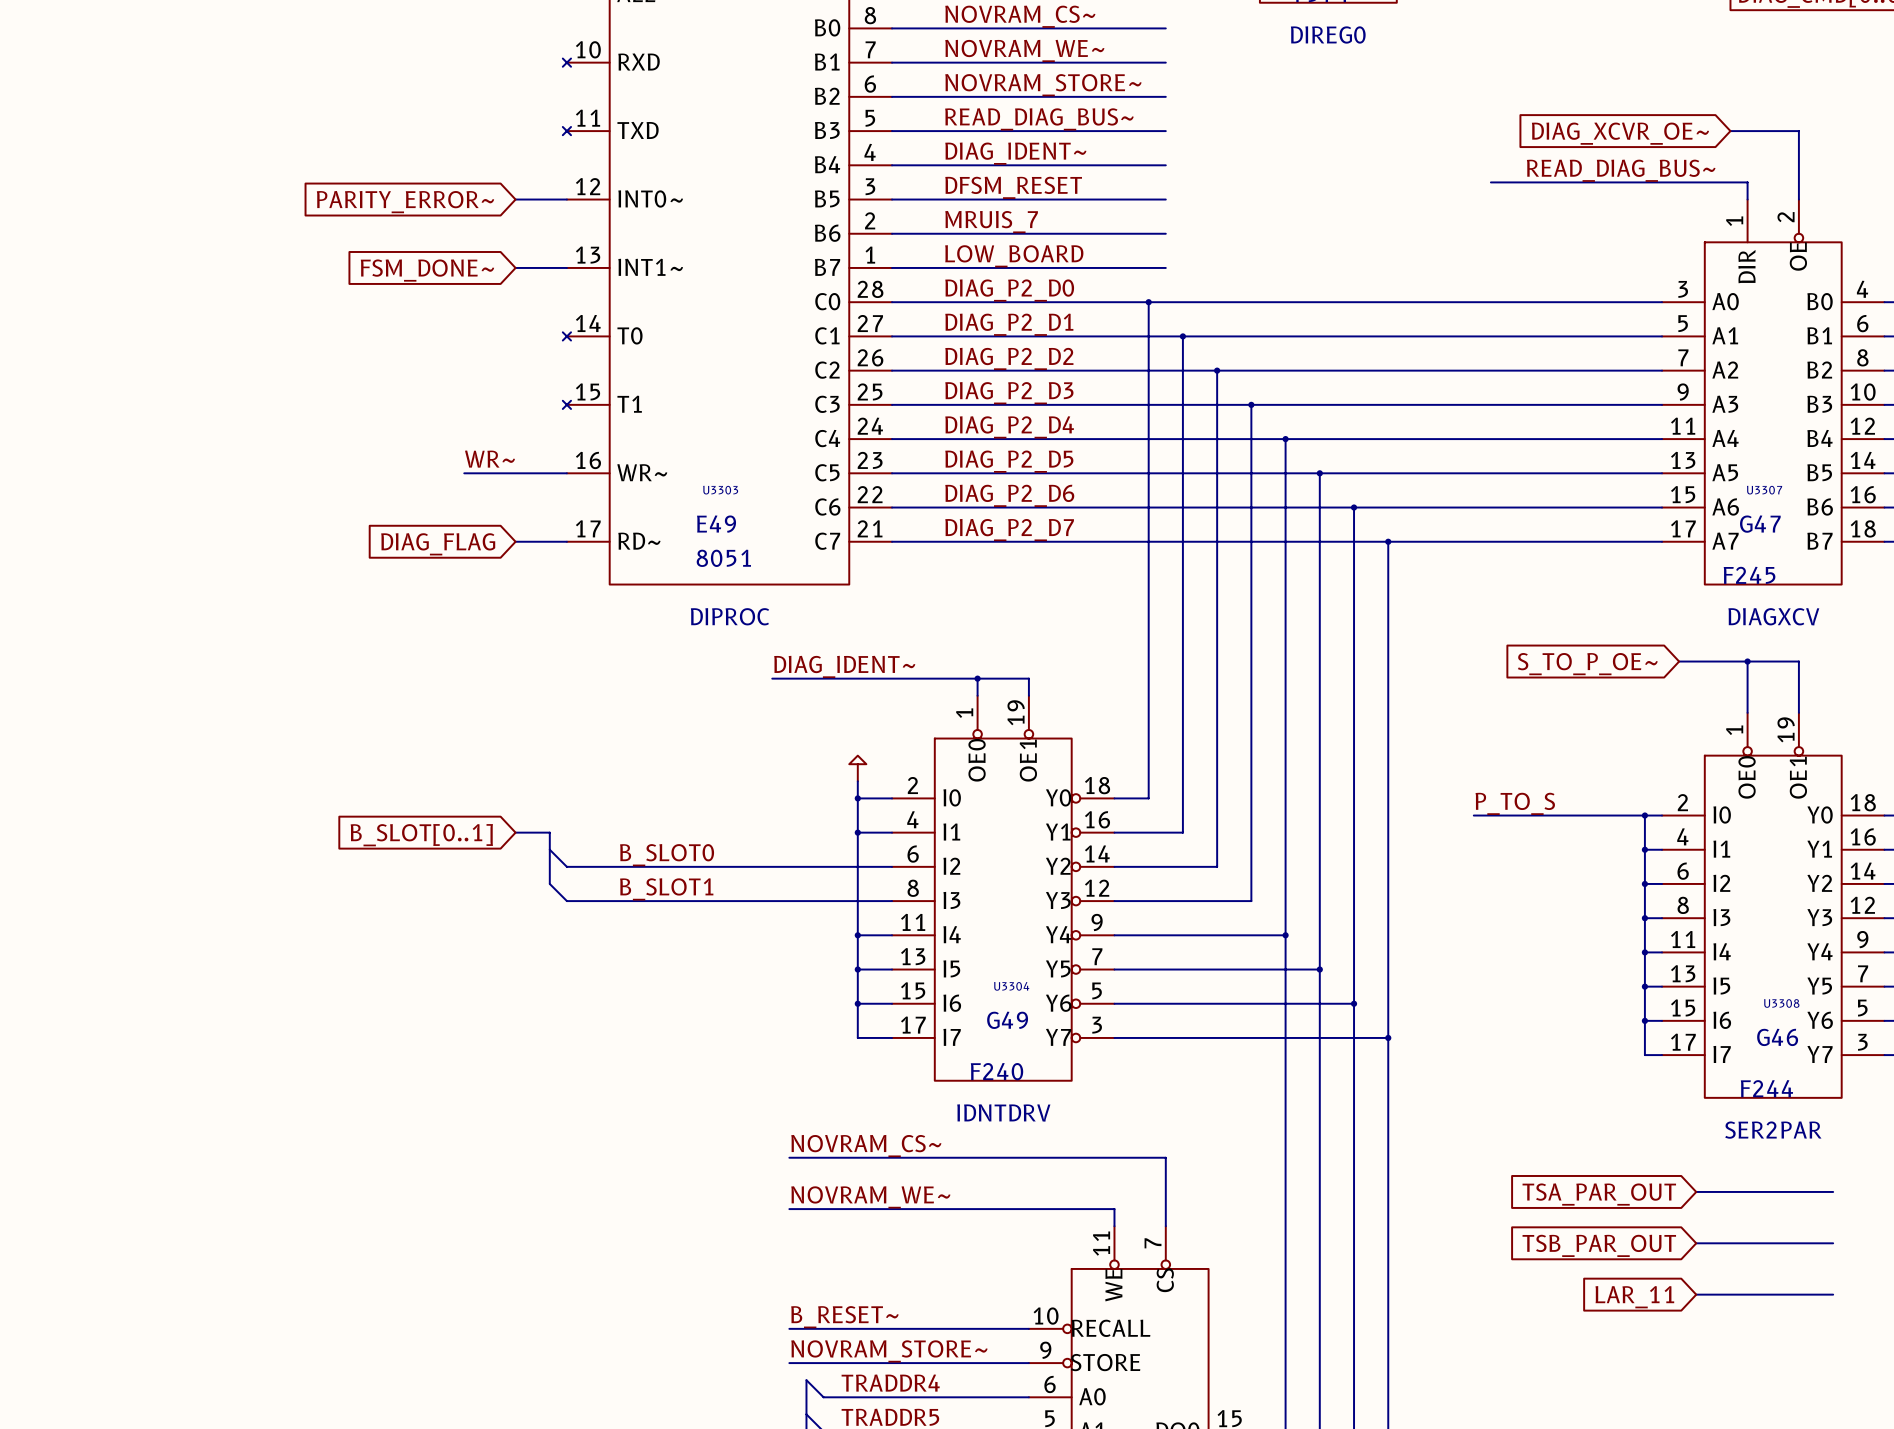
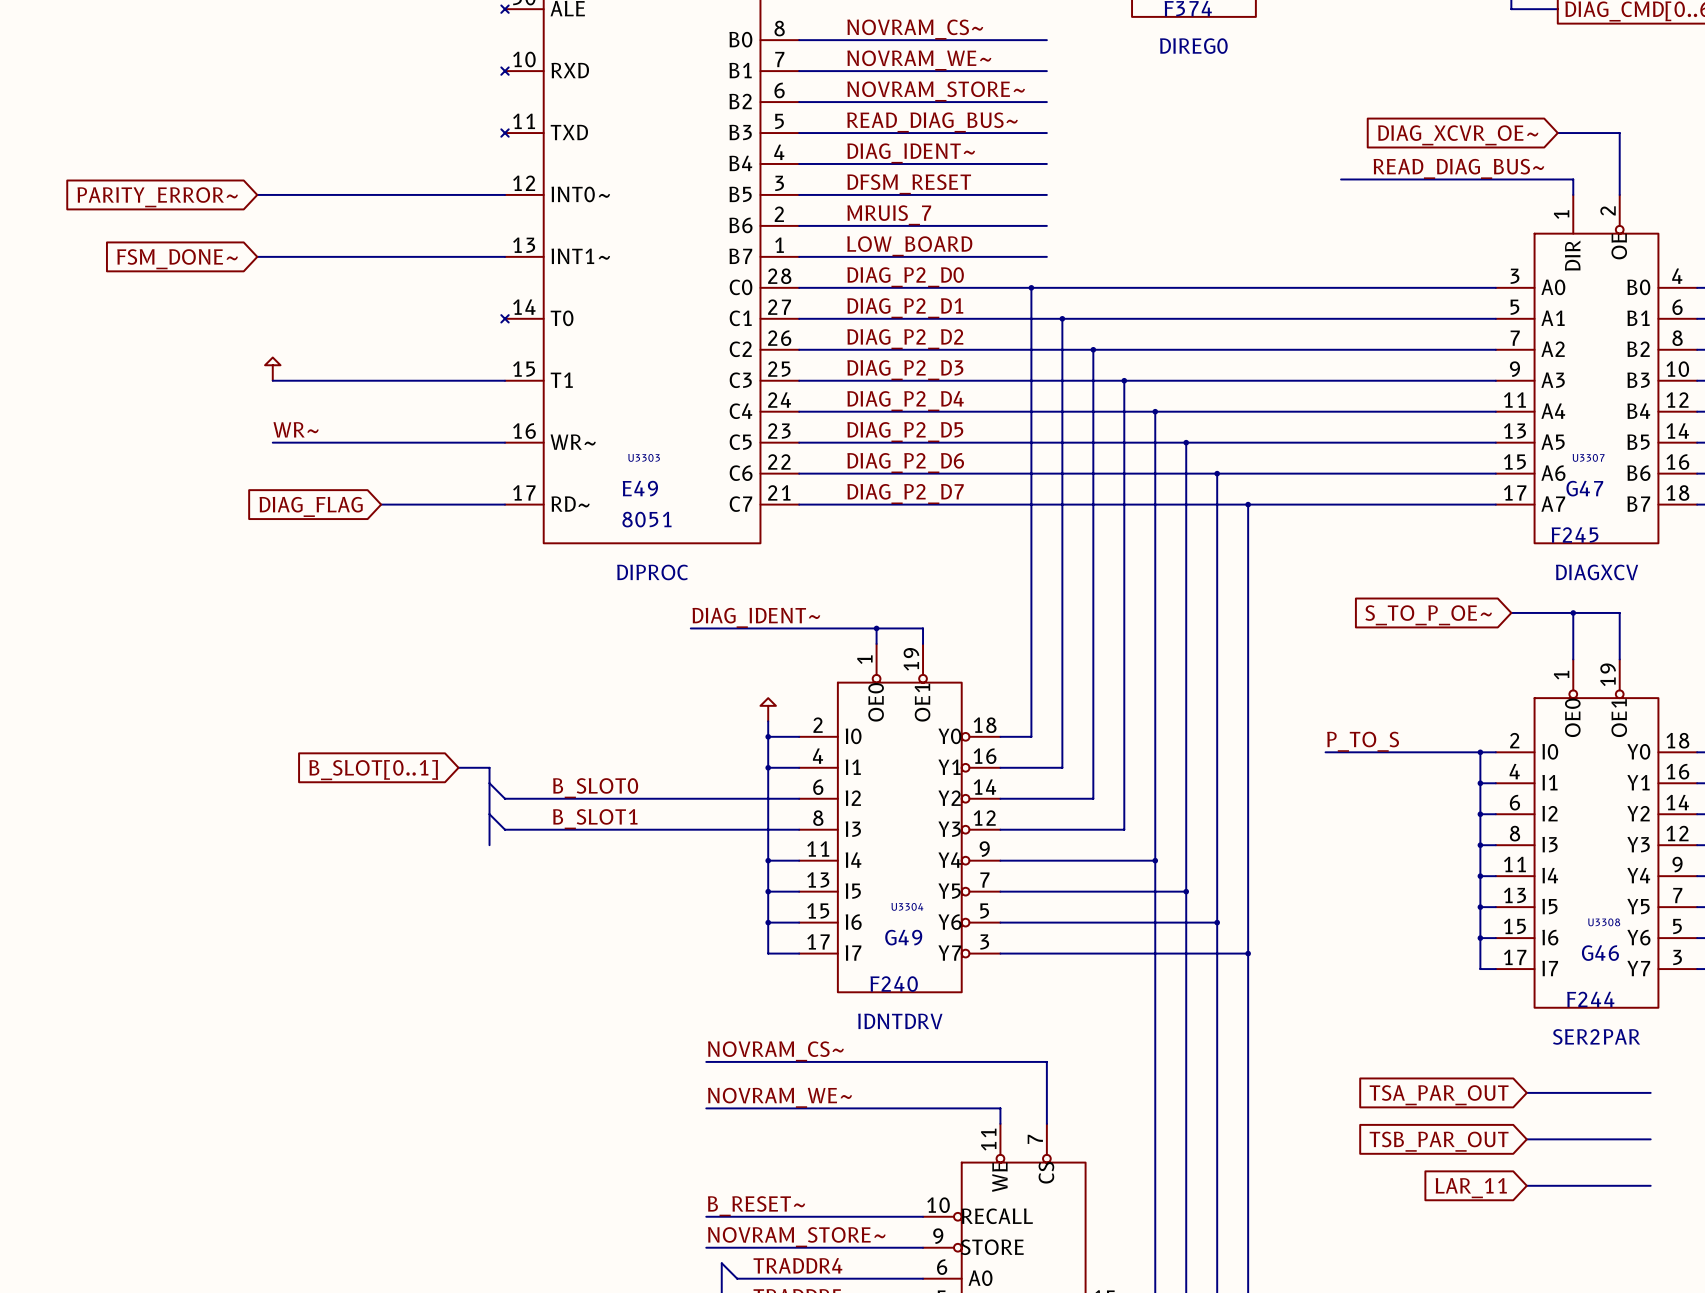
wire: none -> (257, 194) (458, 194)
global label: none -> PARITY_ERROR~ (157, 197)
global label: PARITY_ERROR~ (405, 202) -> none
wire: none -> (257, 256) (458, 256)
global label: none -> FSM_DONE~ (177, 259)
global label: FSM_DONE~ (427, 270) -> none
power symbol: none -> (272, 368)
wire: none -> (272, 380) (505, 380)
no-connect mark: (566, 404) -> none
label position: WR~ (489, 459) -> WR~ (296, 429)
wire: none -> (272, 442) (412, 442)
wire: none -> (381, 504) (458, 504)
global label position: DIAG_FLAG (438, 544) -> DIAG_FLAG (311, 506)
bus: none -> (489, 814) (489, 845)

